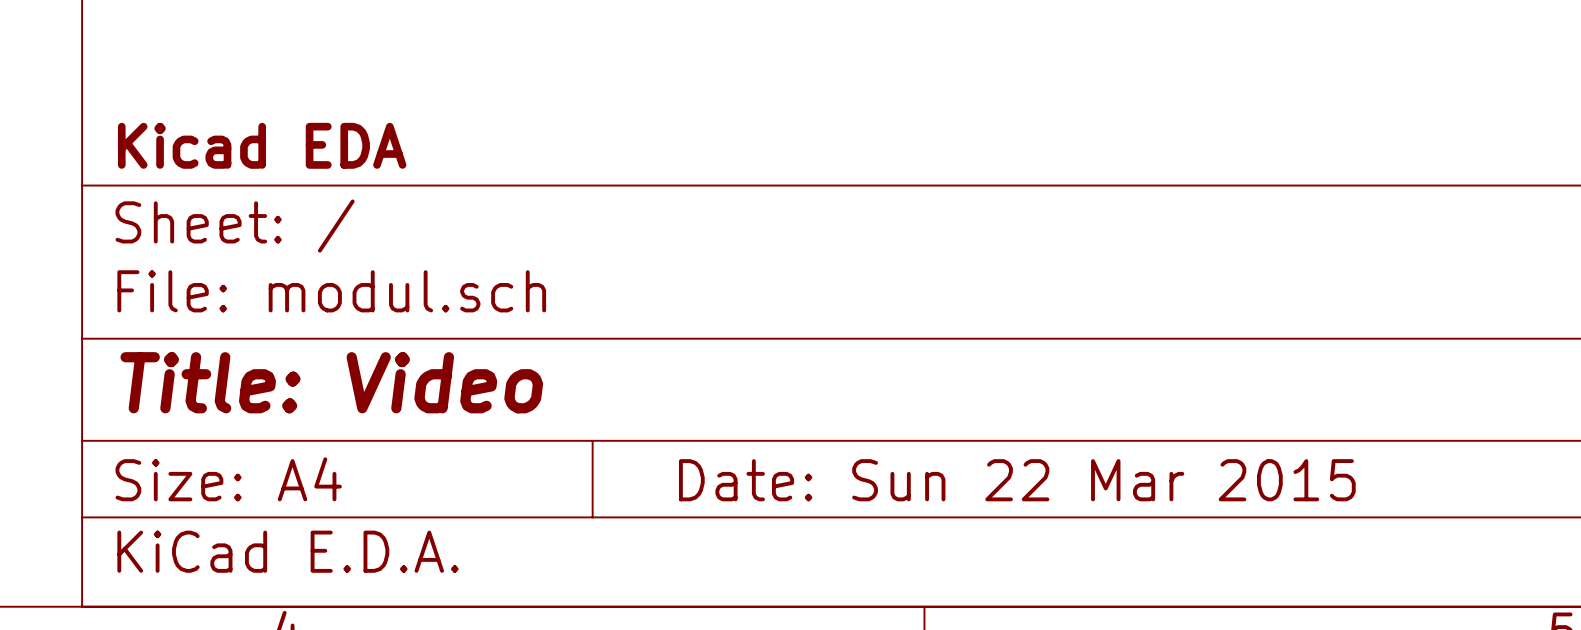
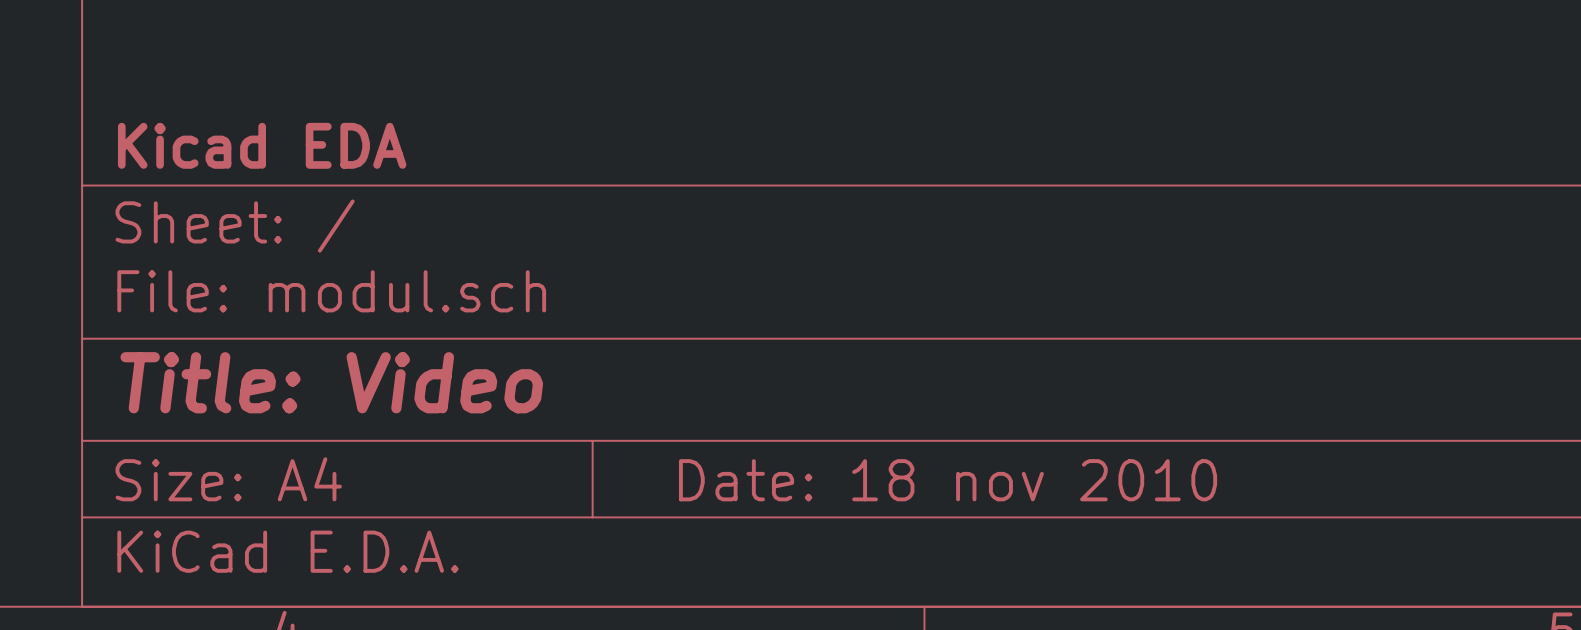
title block: Date: Sun 22 Mar 2015 (1017, 480) -> Date: 18 nov 2010 (948, 480)

